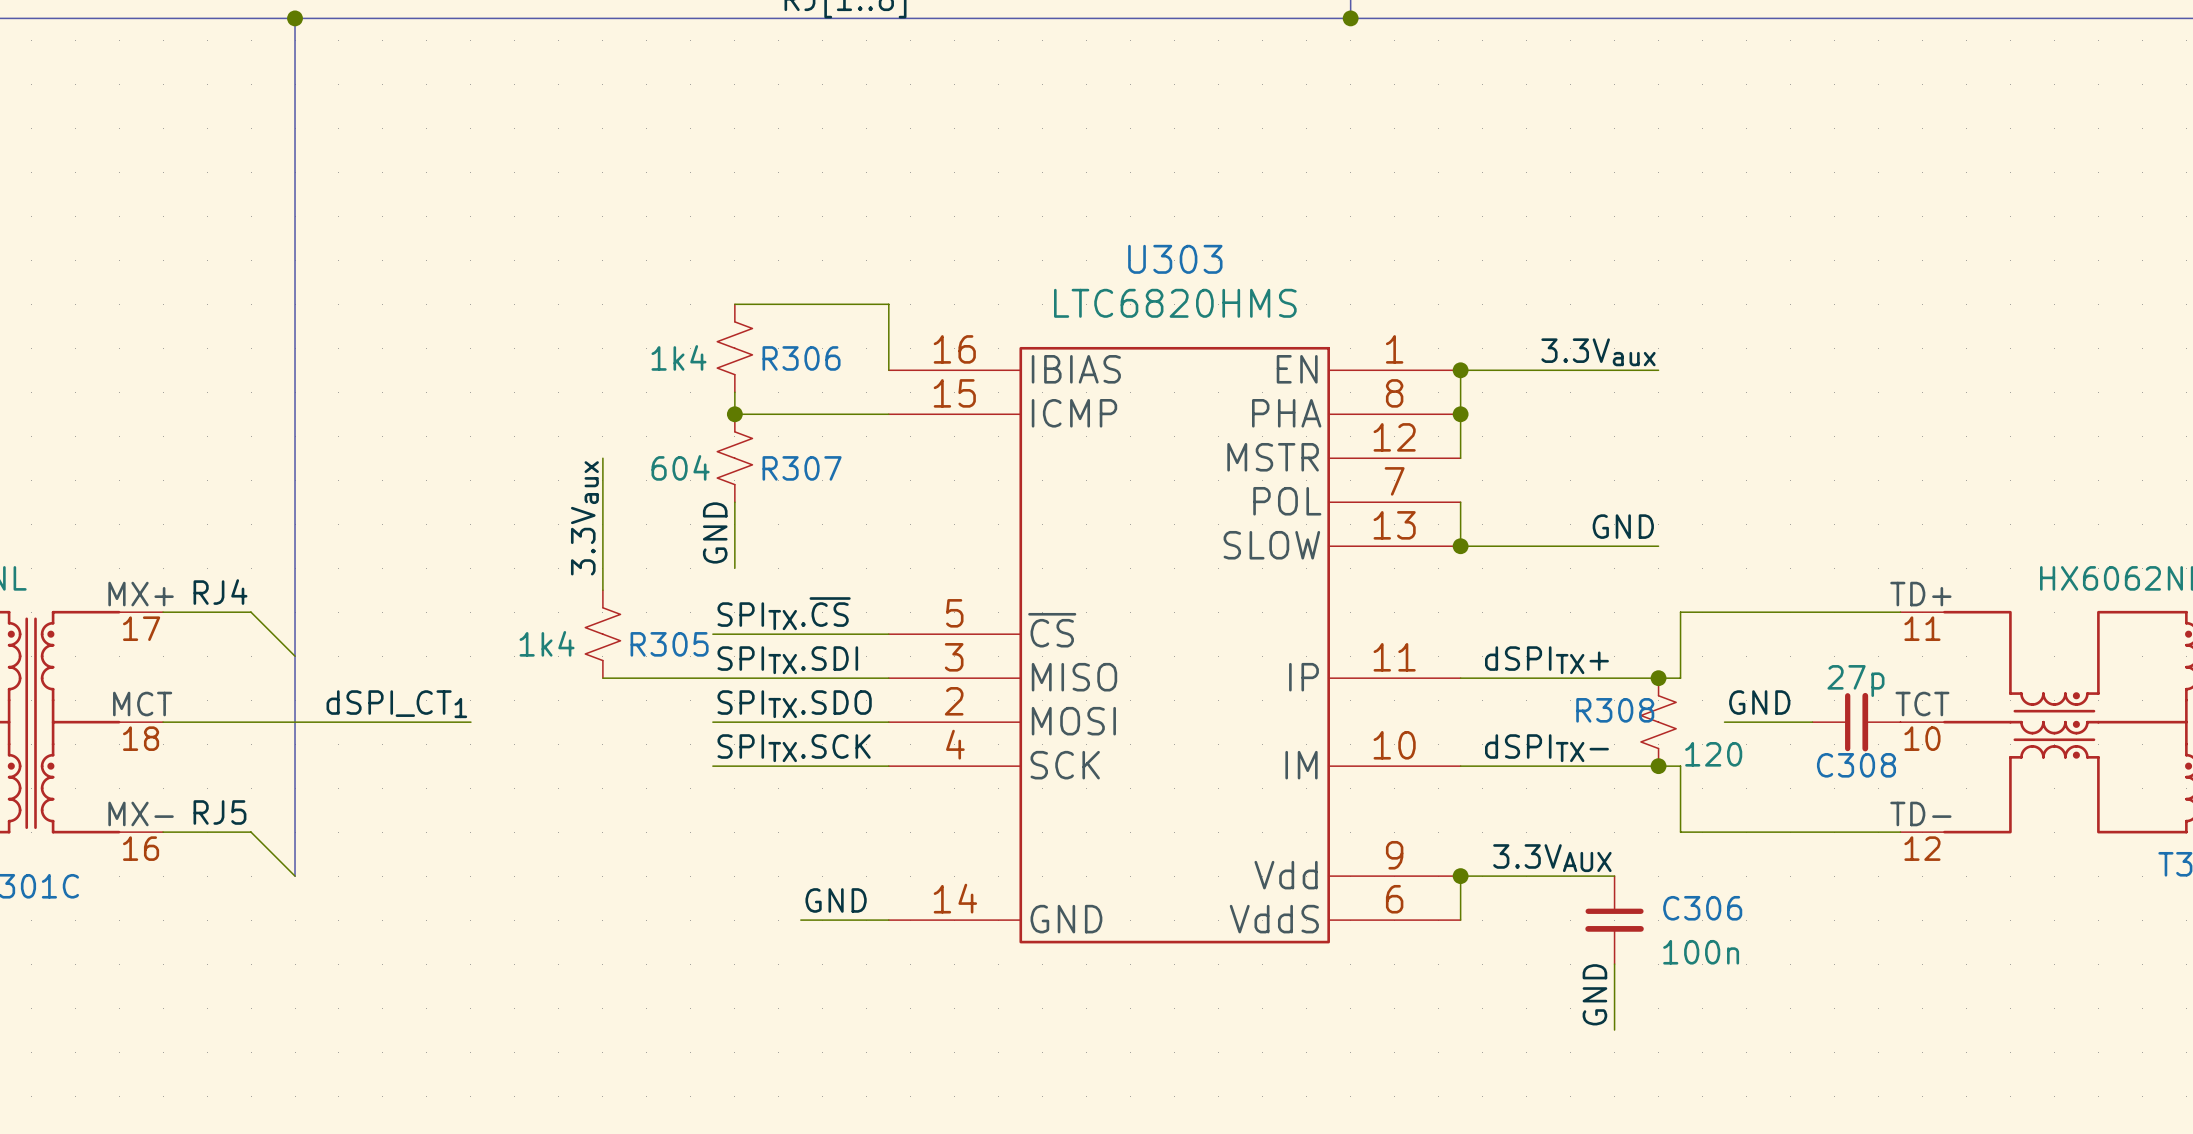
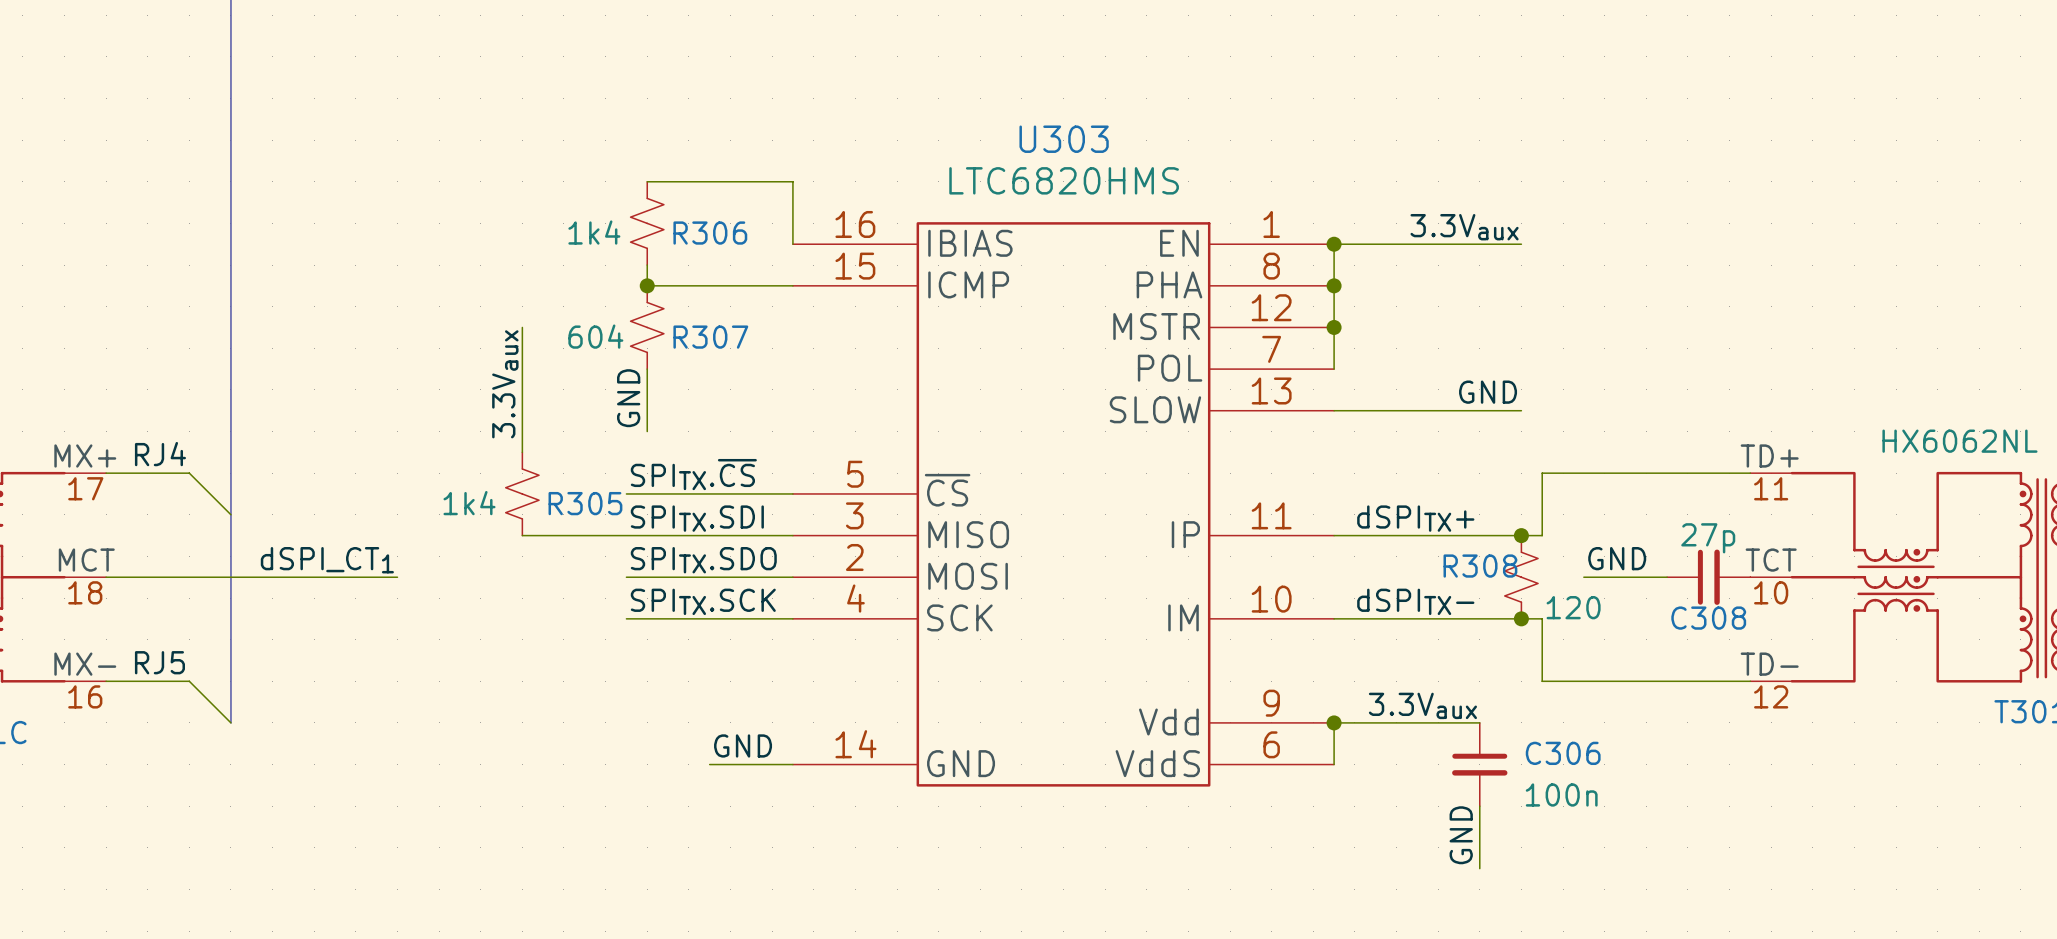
wire: (1460, 502) (1460, 546) -> (1334, 369) (1334, 327)
junction position: (1460, 546) -> (1334, 327)
label: 3.3VAUX (1552, 858) -> 3.3Vaux (1422, 705)

